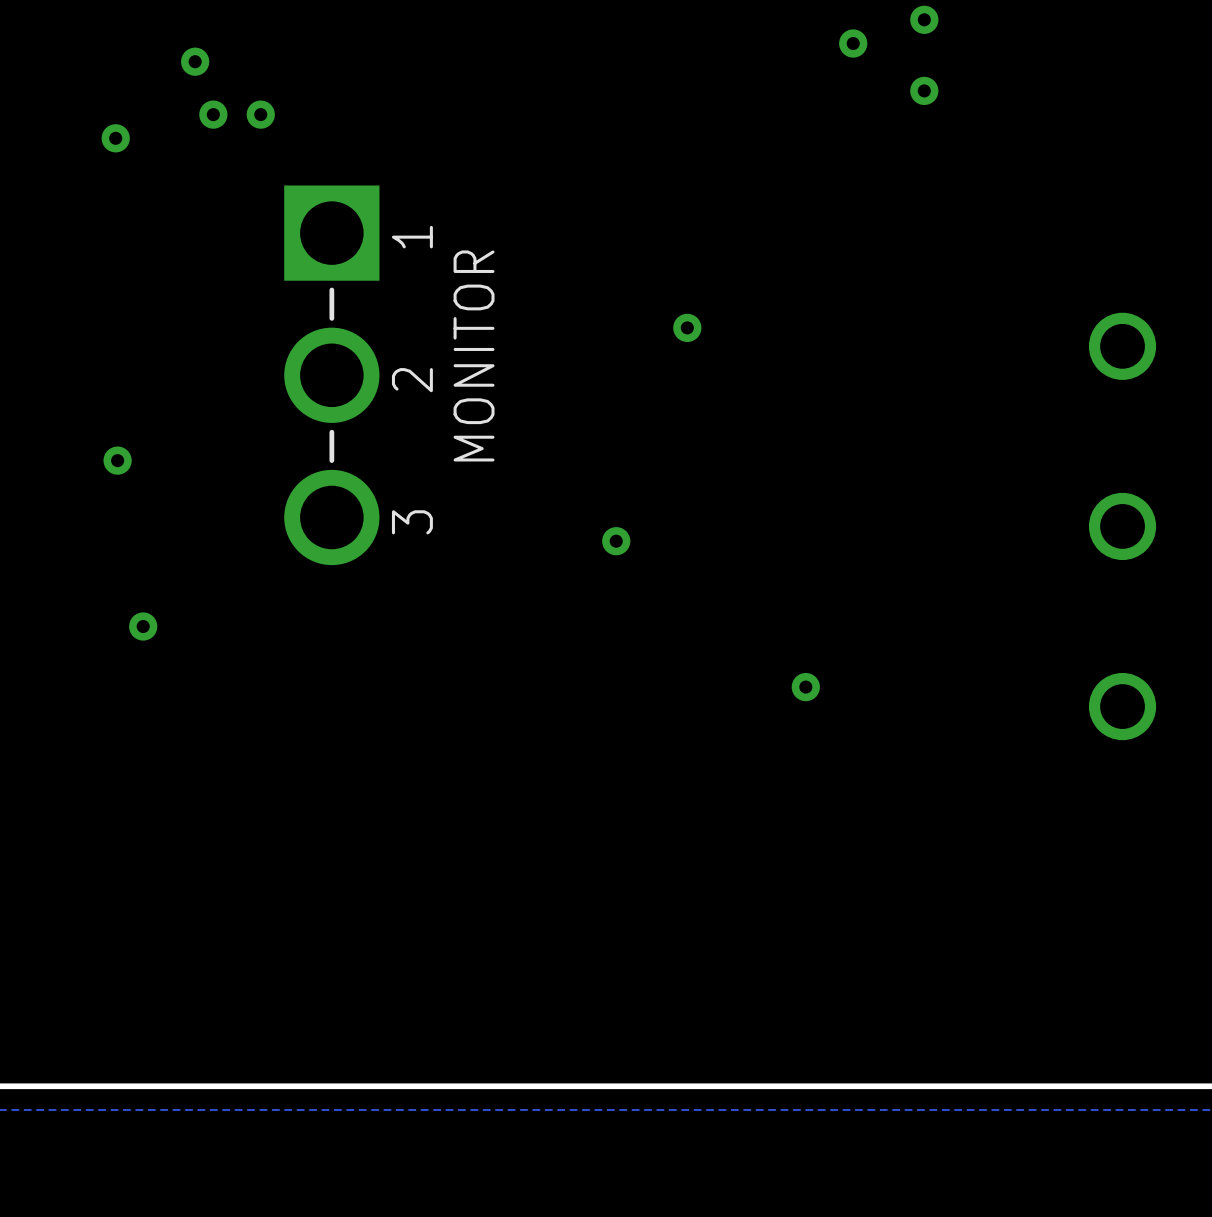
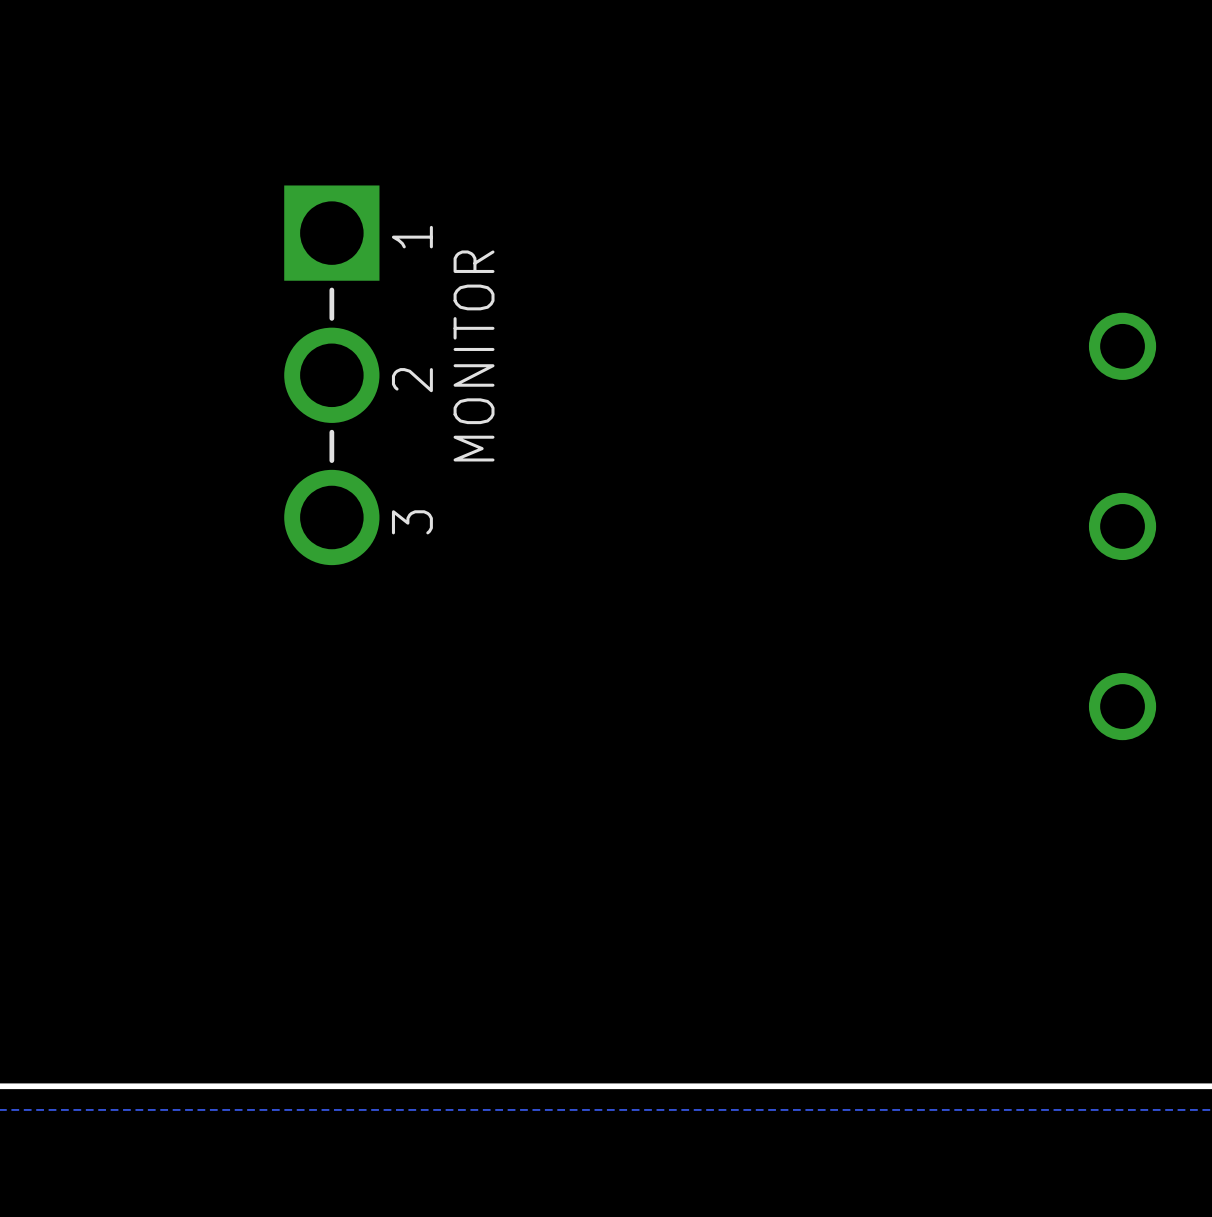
via: (924, 19) -> none
via: (853, 43) -> none
via: (195, 61) -> none
via: (924, 90) -> none
via: (213, 114) -> none
via: (260, 114) -> none
via: (115, 138) -> none
via: (687, 327) -> none
via: (117, 460) -> none
via: (616, 541) -> none
via: (143, 626) -> none
via: (805, 687) -> none

